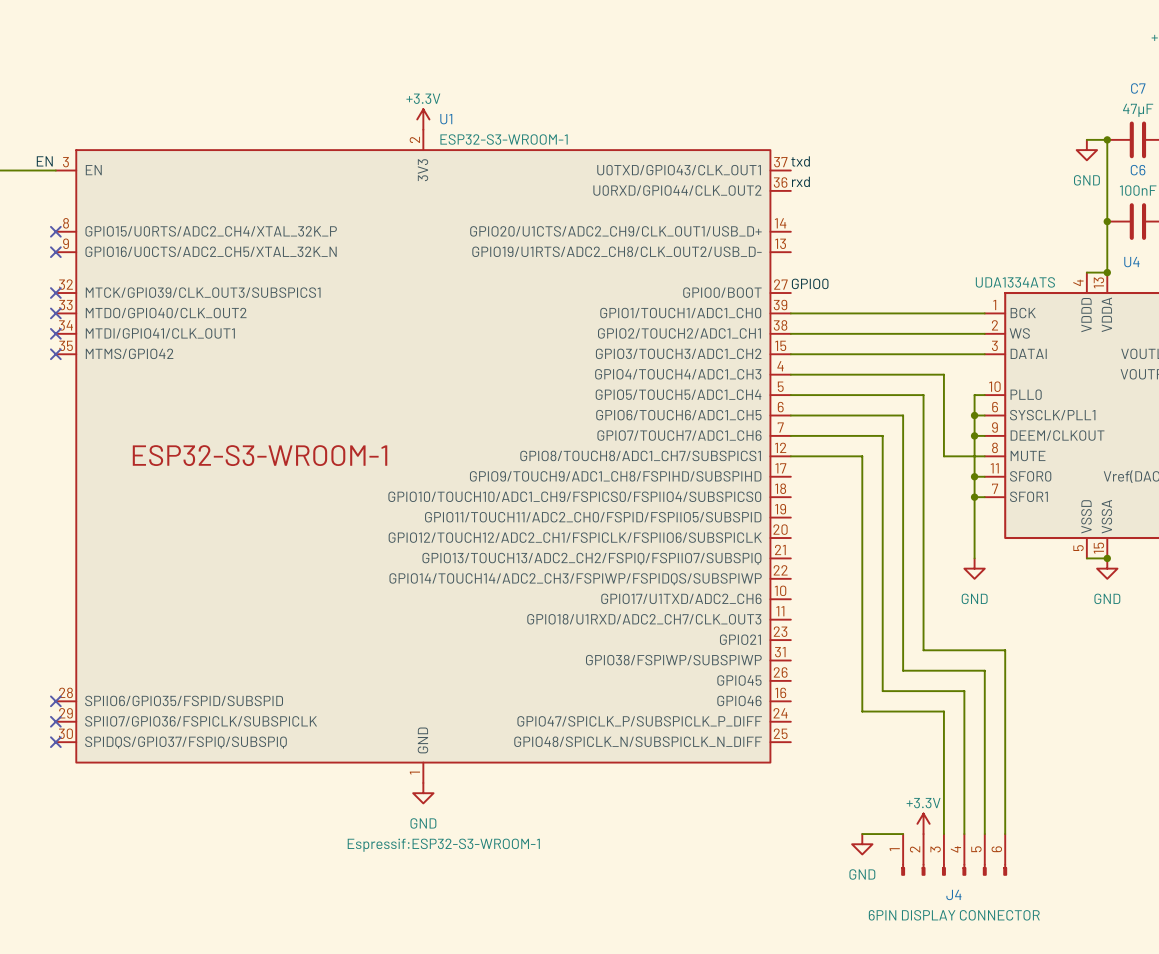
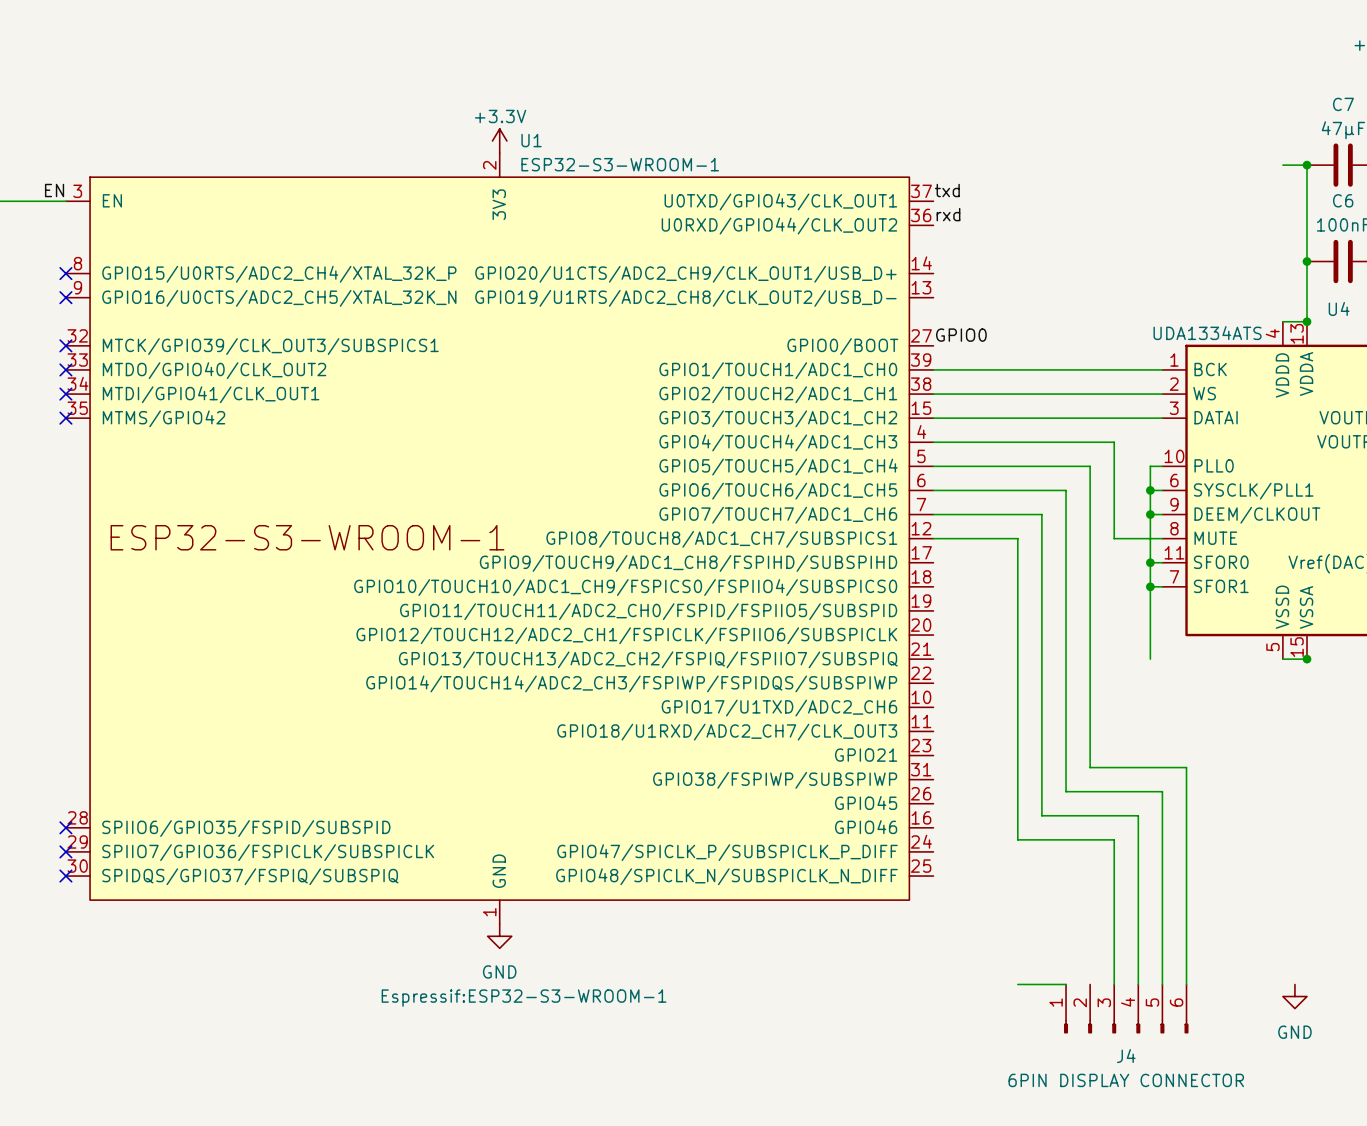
power symbol: GND (1086, 150) -> none
power symbol: GND (974, 568) -> none
power symbol: GND (1107, 568) -> none
power symbol: +3.3V (923, 823) -> none
power symbol: GND (862, 844) -> none
power symbol: none -> GND (1294, 996)

